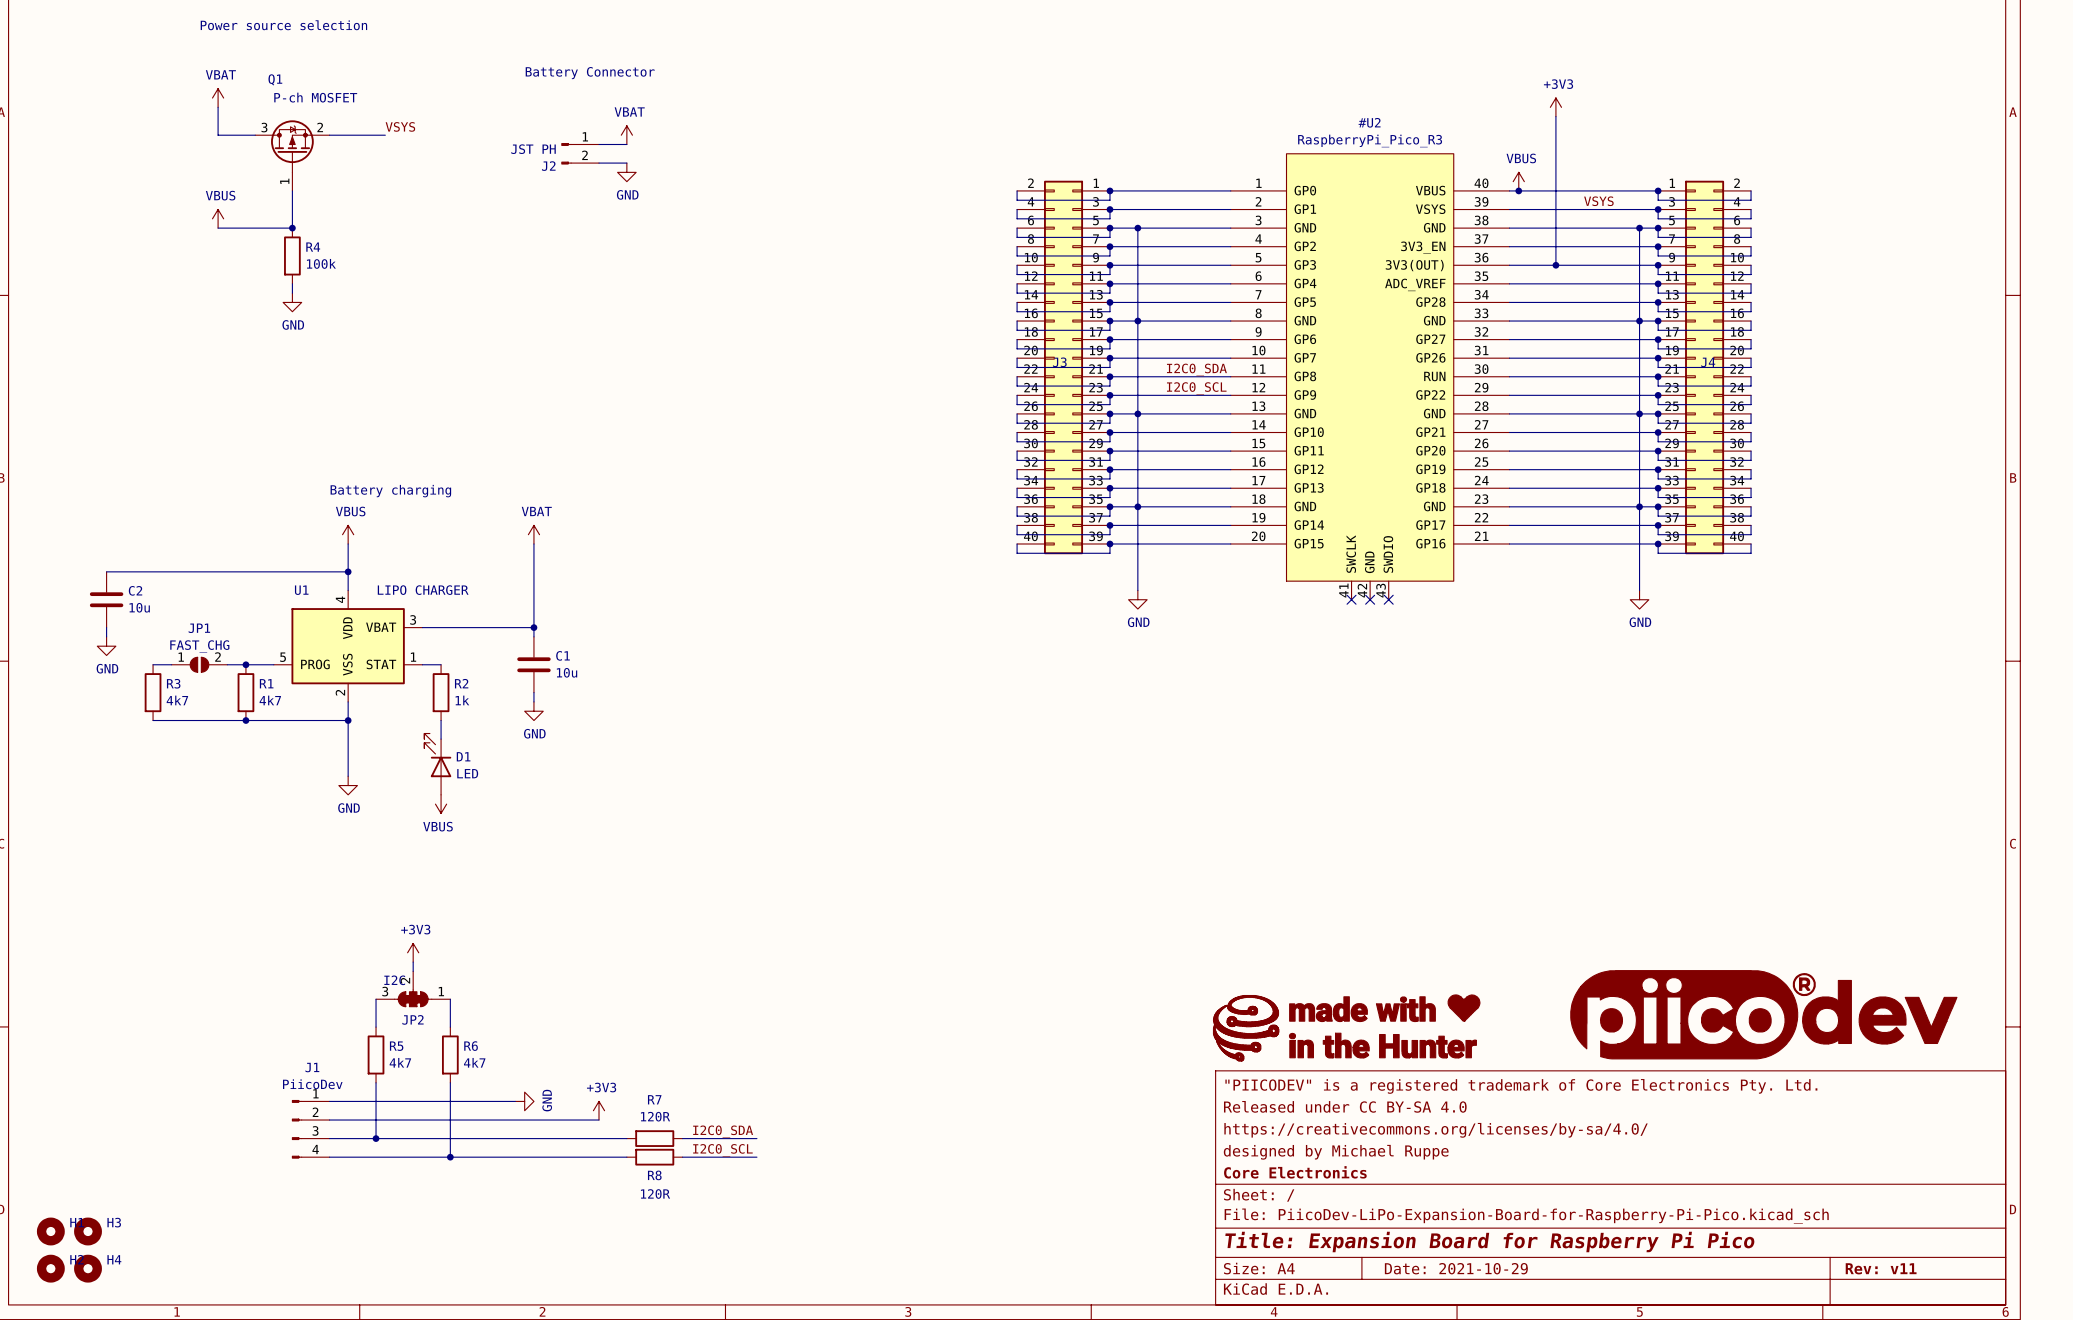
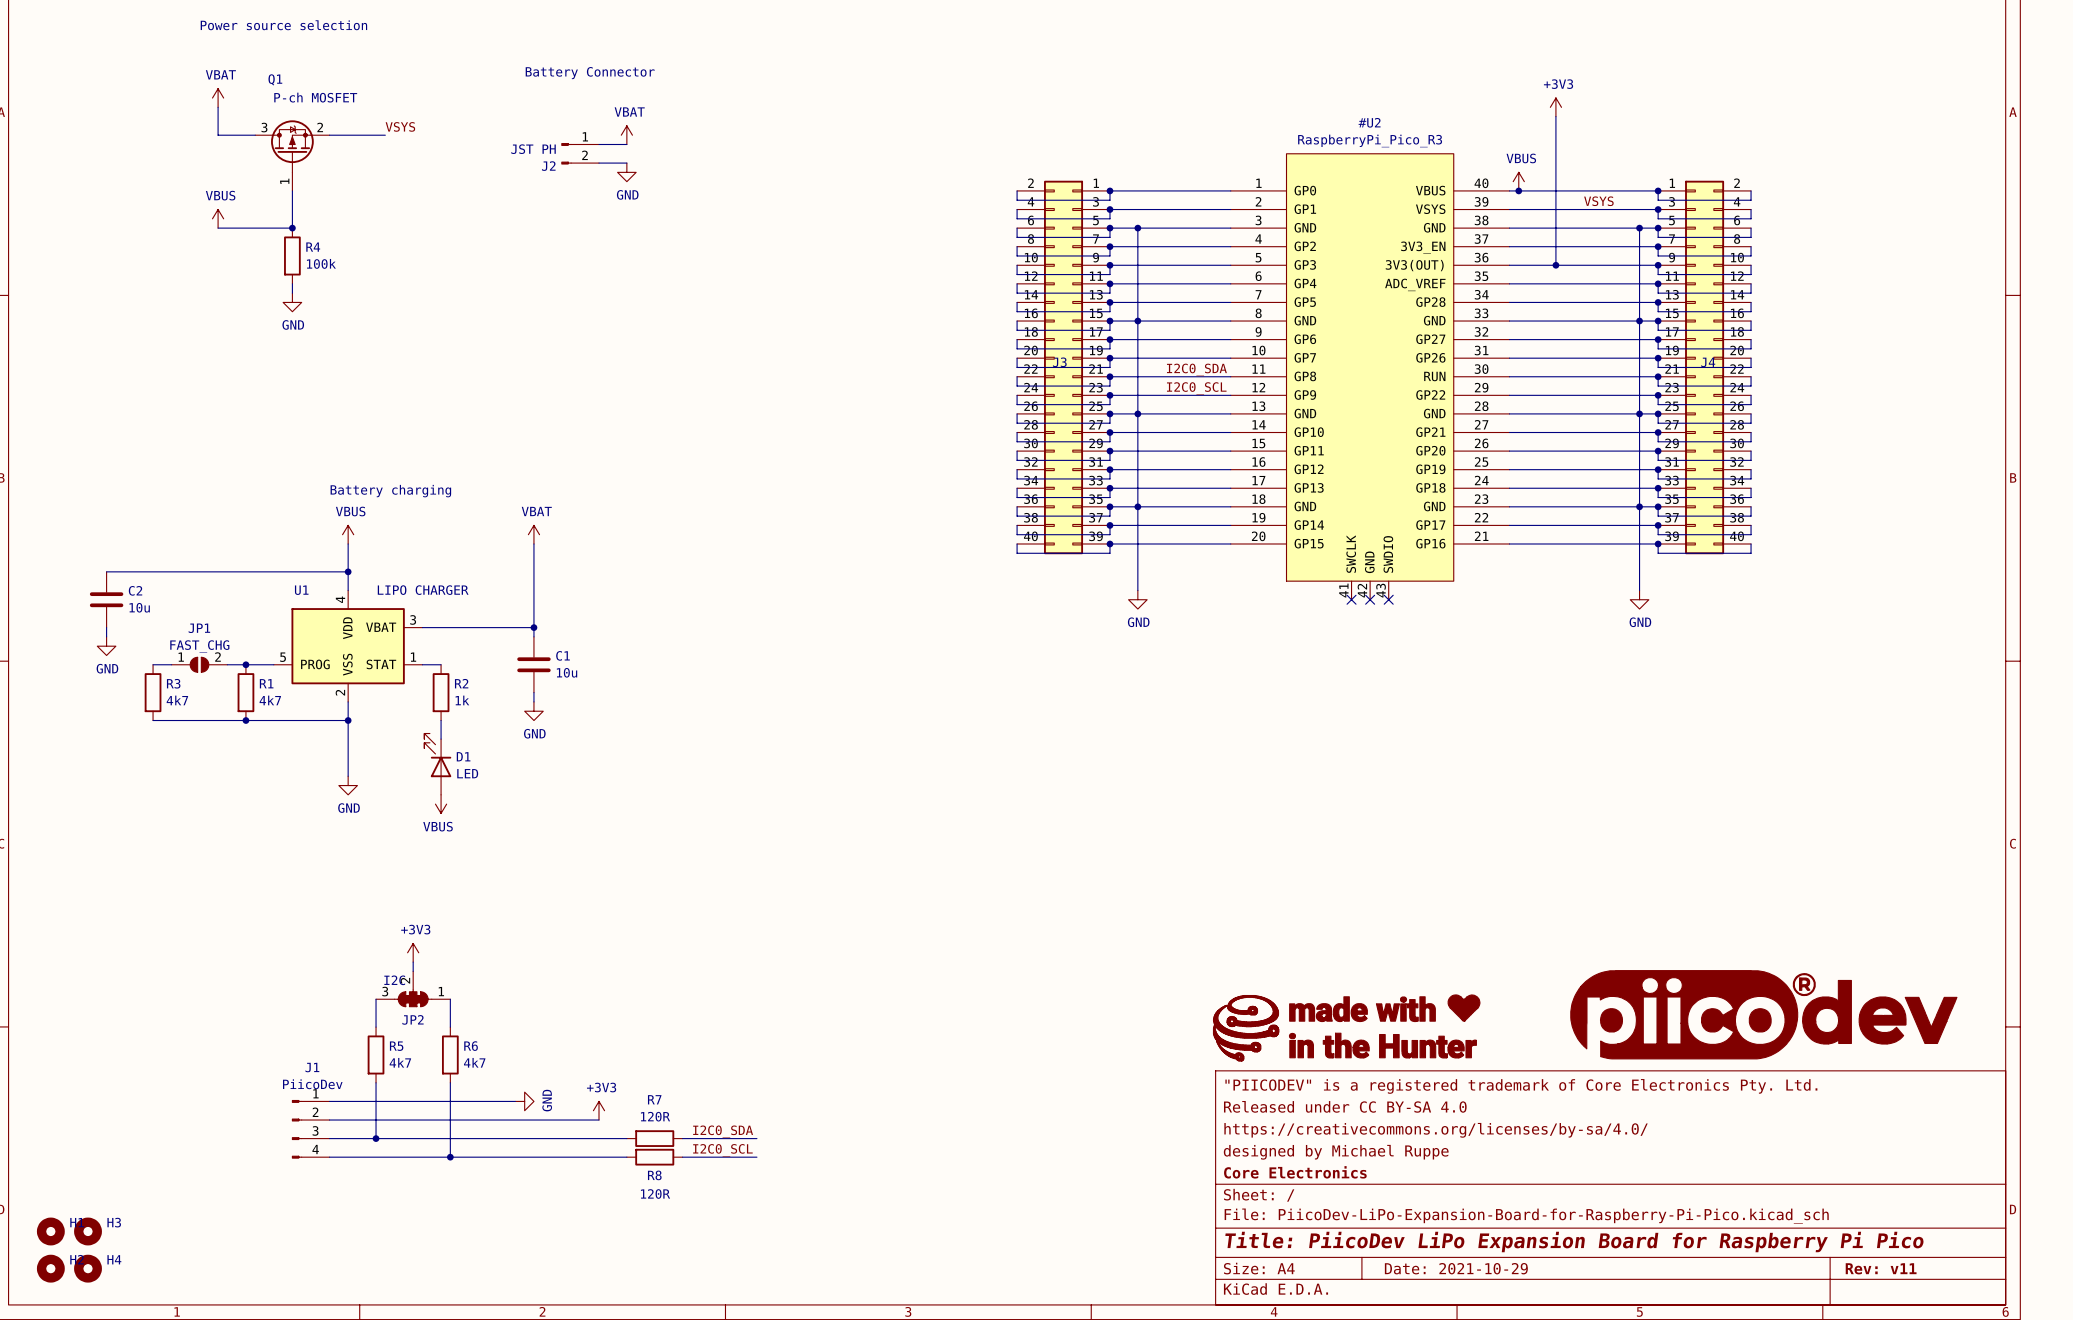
title block: Title: Expansion Board for Raspberry Pi Pico (1489, 1242) -> Title: PiicoDev LiPo Expansion Board for Raspberry Pi Pico (1574, 1242)

